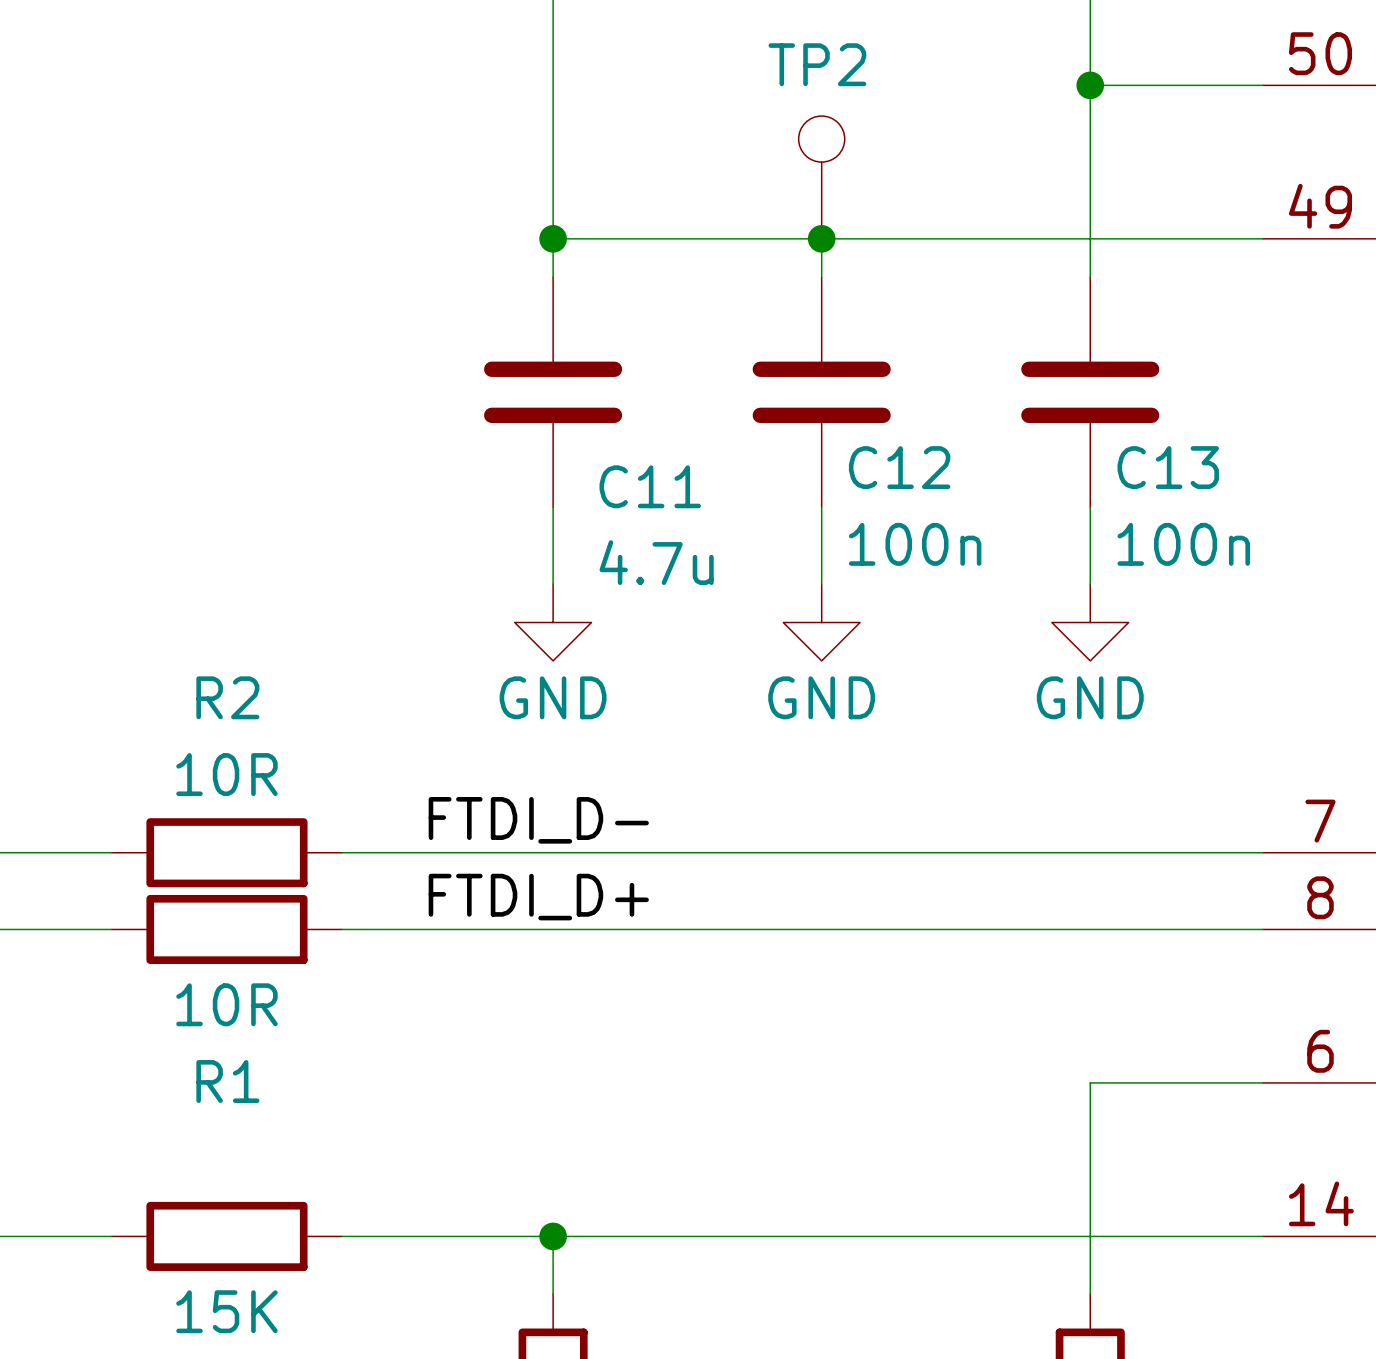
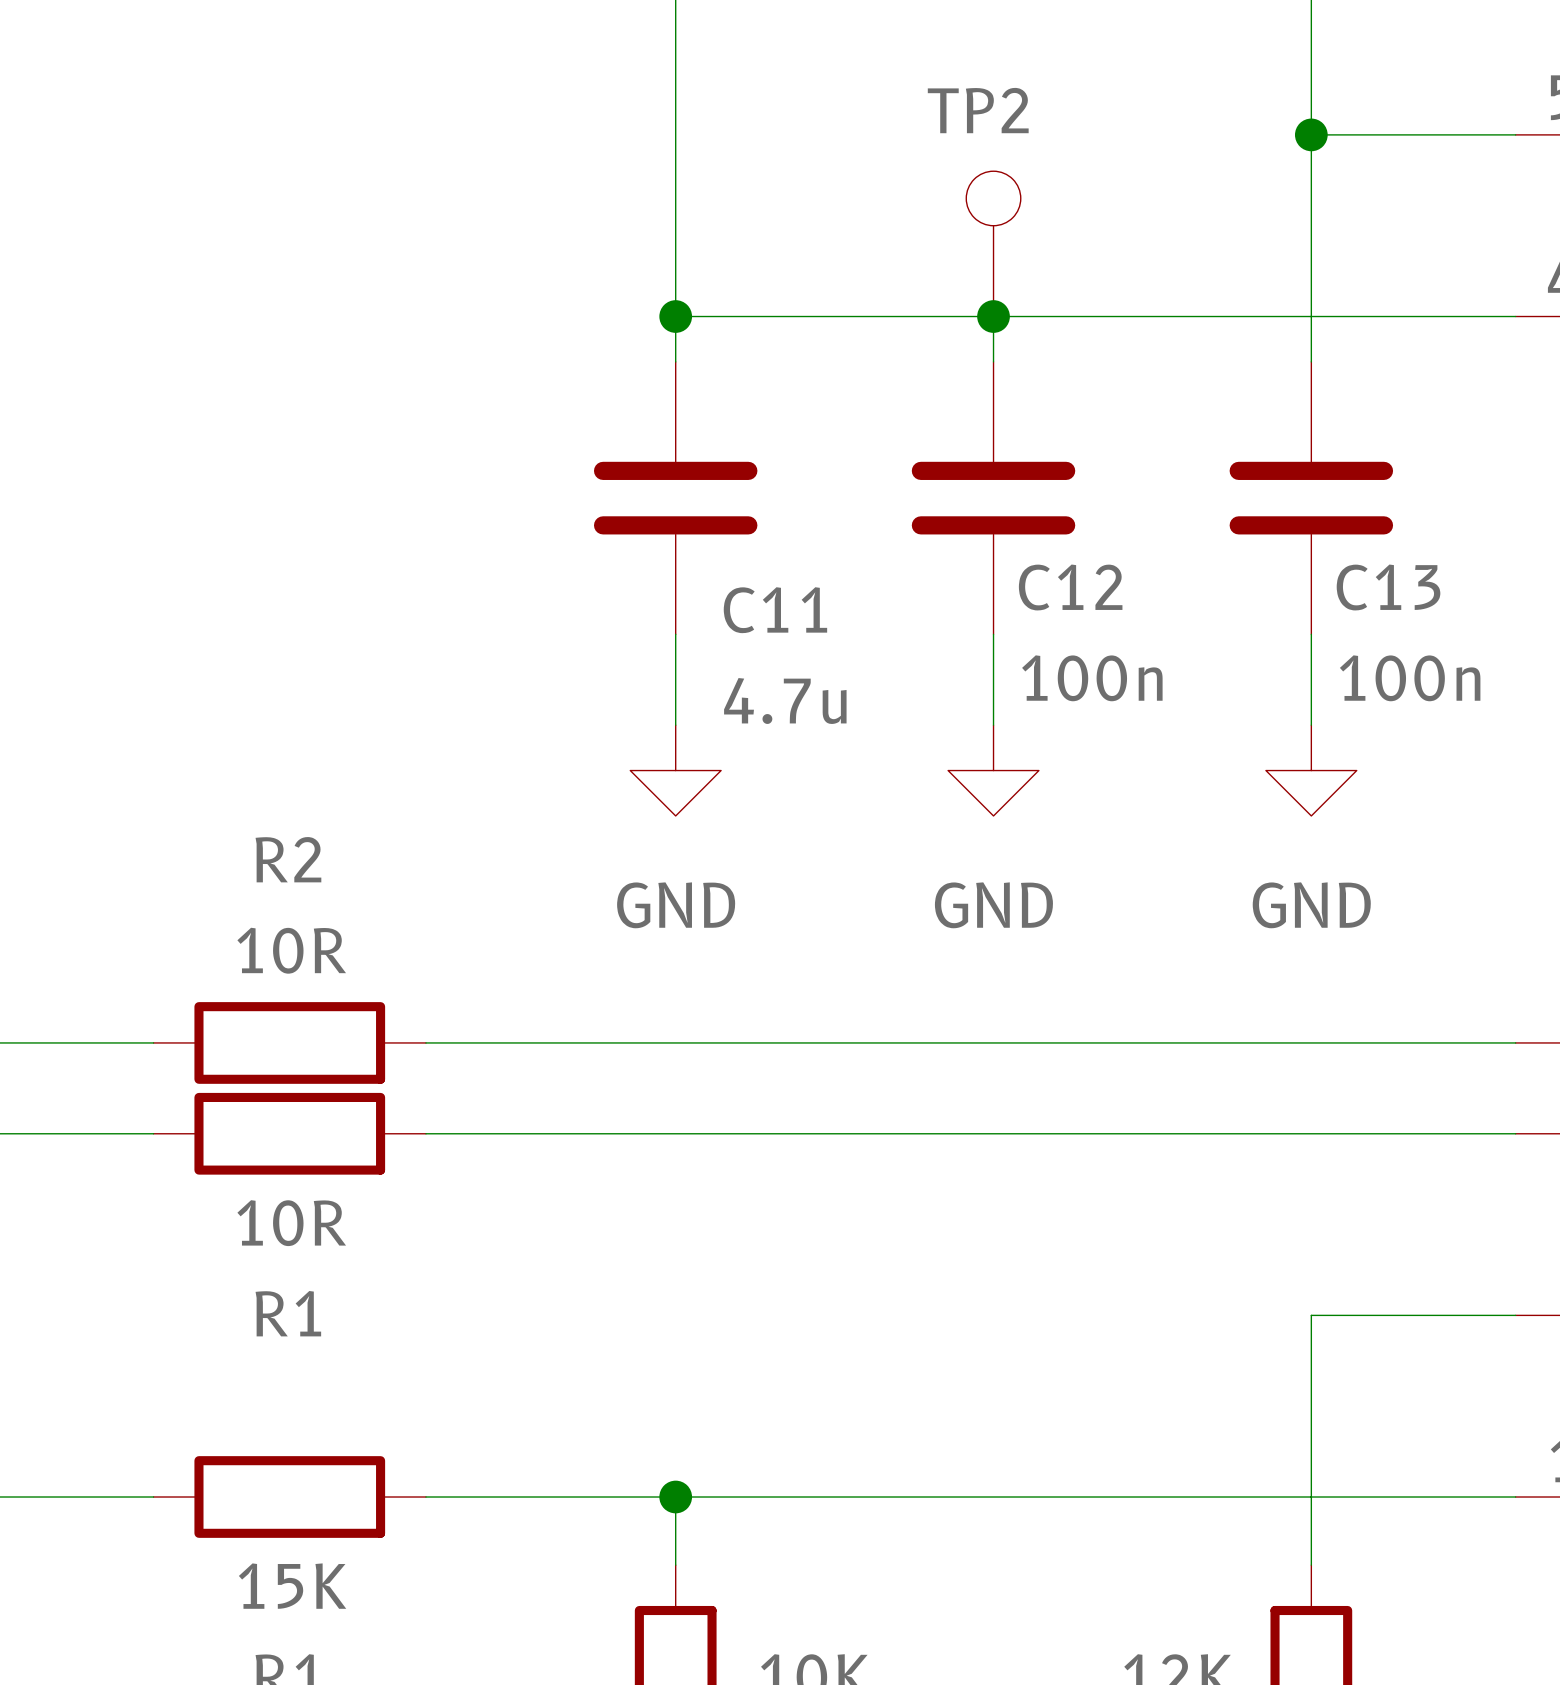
power symbol text position: GND (553, 697) -> GND (676, 905)
power symbol text position: GND (821, 697) -> GND (993, 905)
power symbol text position: GND (1090, 697) -> GND (1311, 905)
label: FTDI_D- (538, 820) -> none
label: FTDI_D+ (538, 897) -> none

